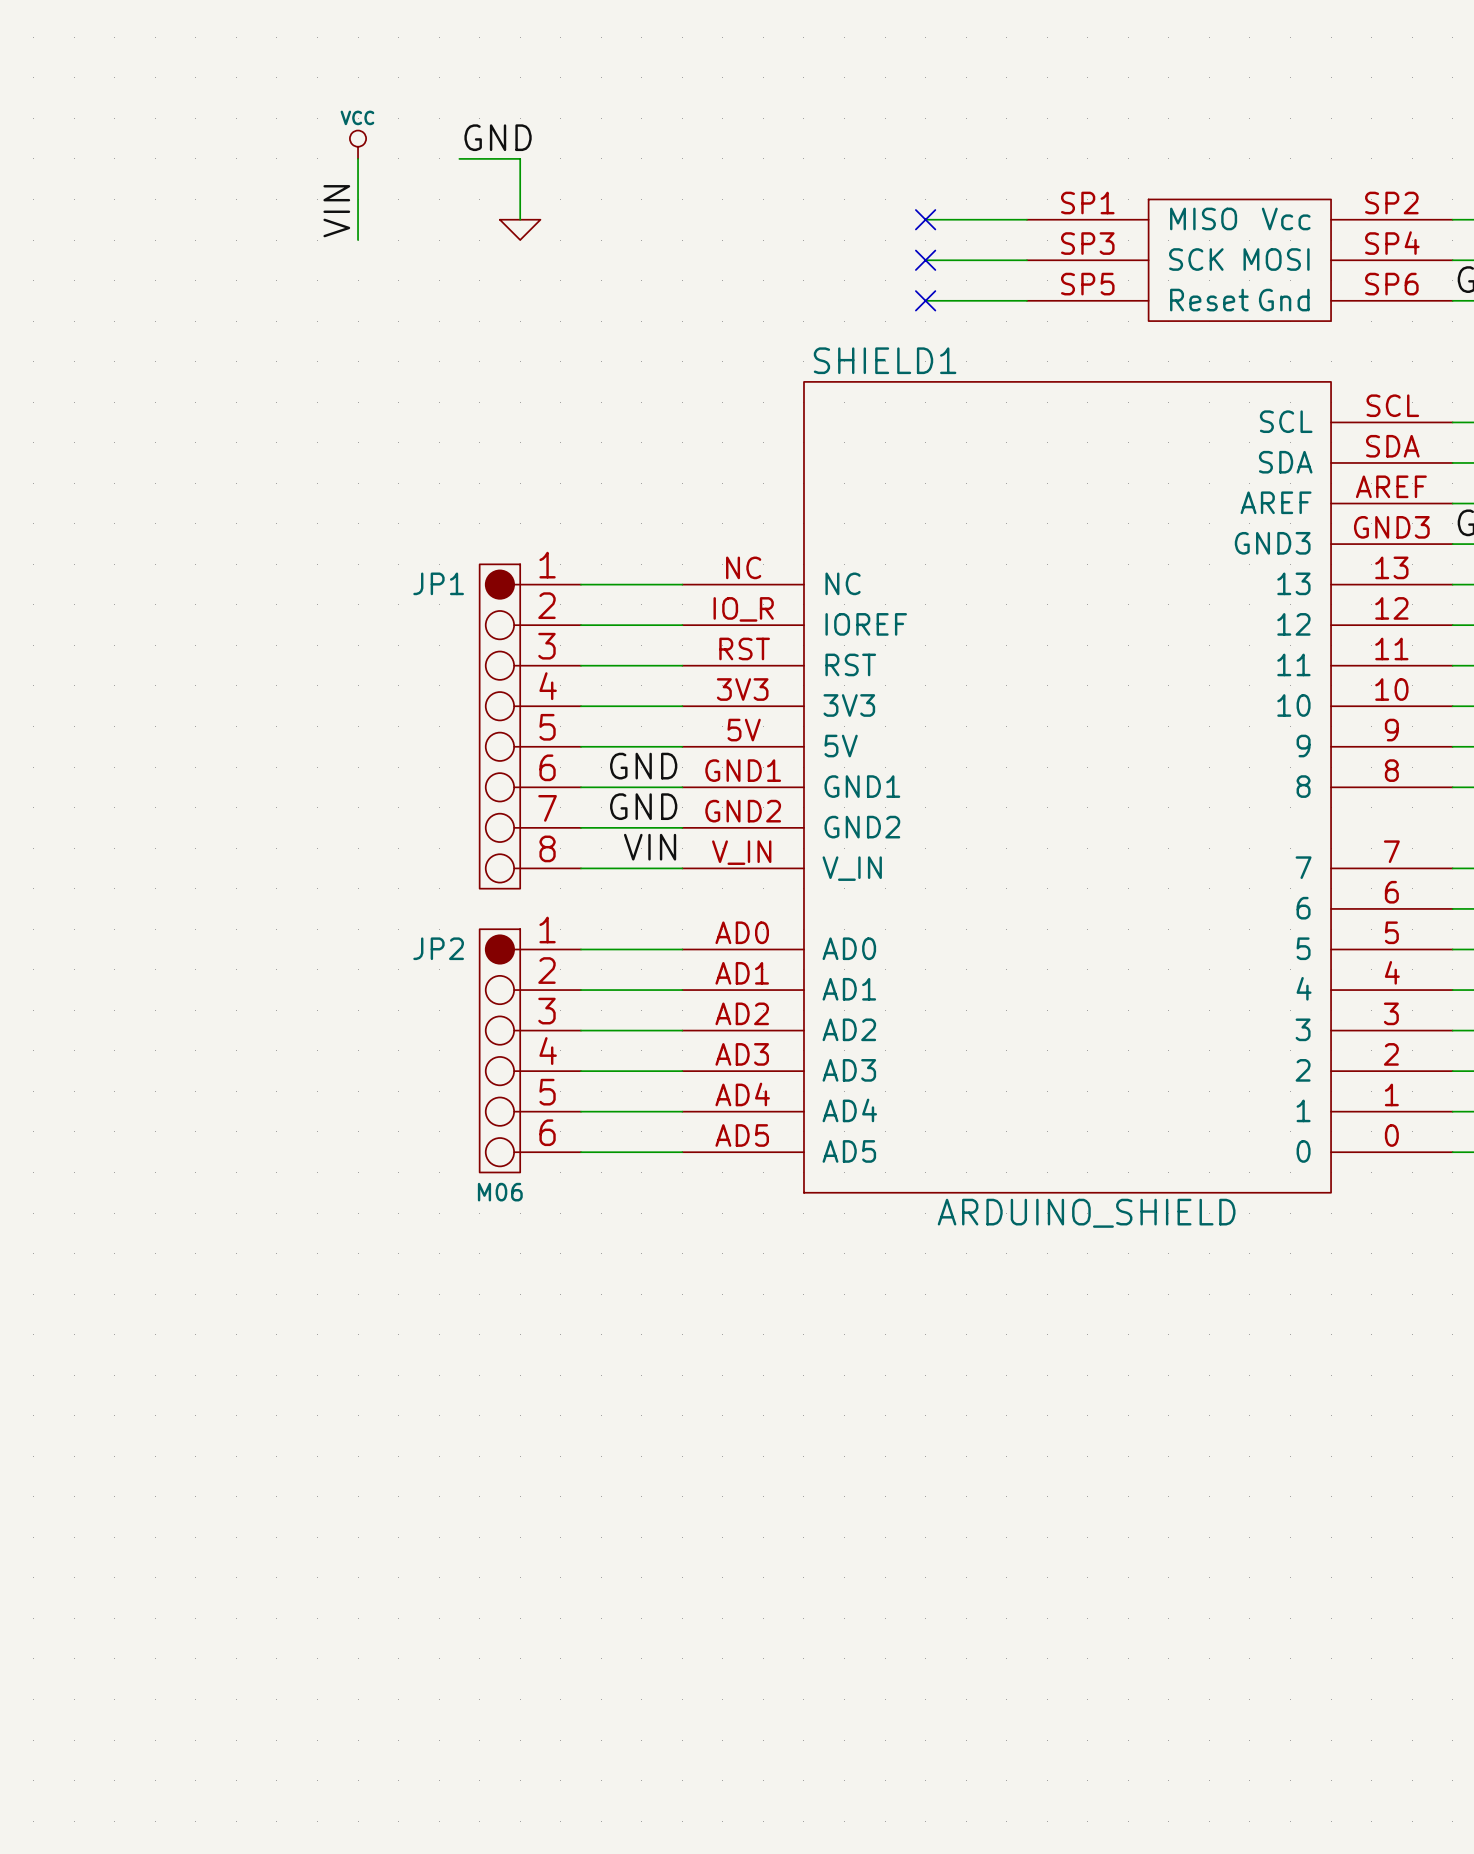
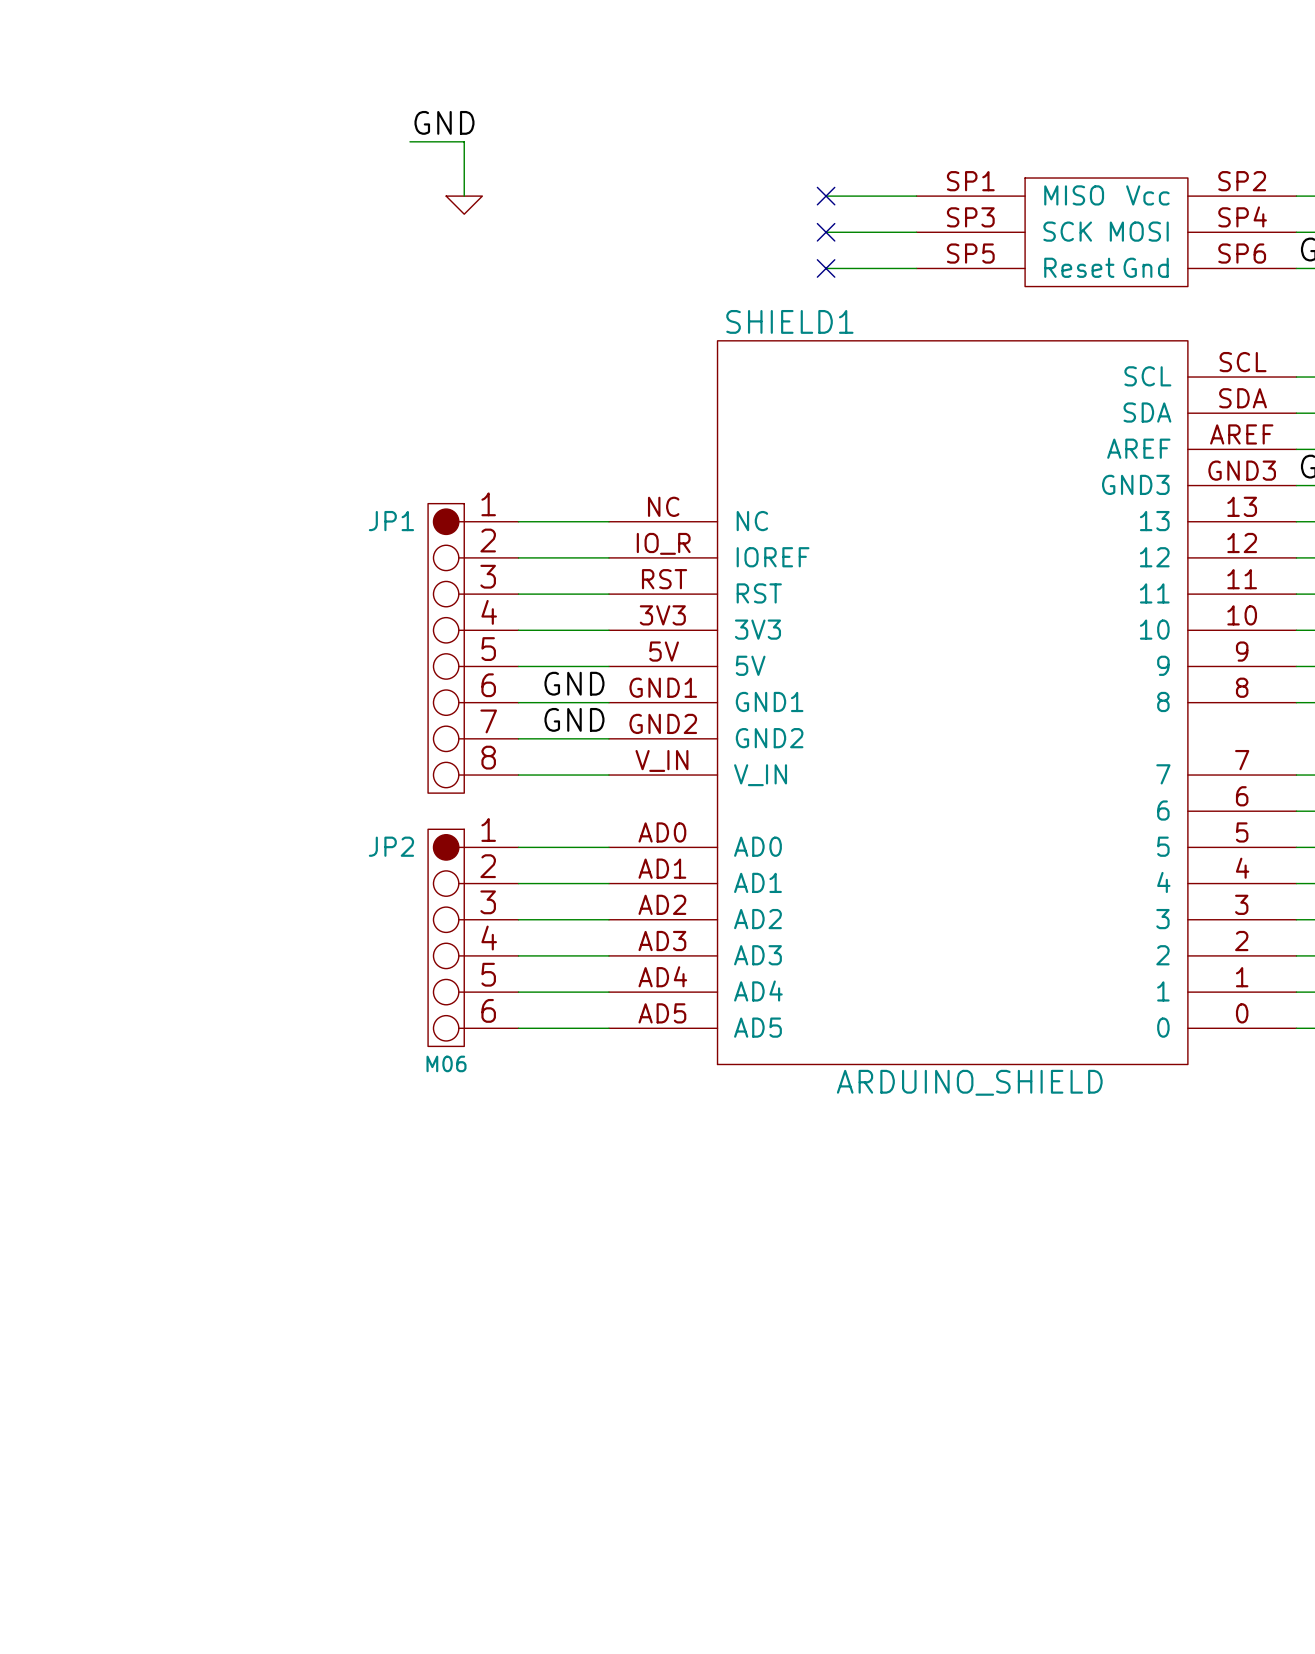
power symbol: VCC (358, 144) -> none
wire: (358, 158) (358, 240) -> none
label: VIN (336, 211) -> none
label: VIN (650, 847) -> none

